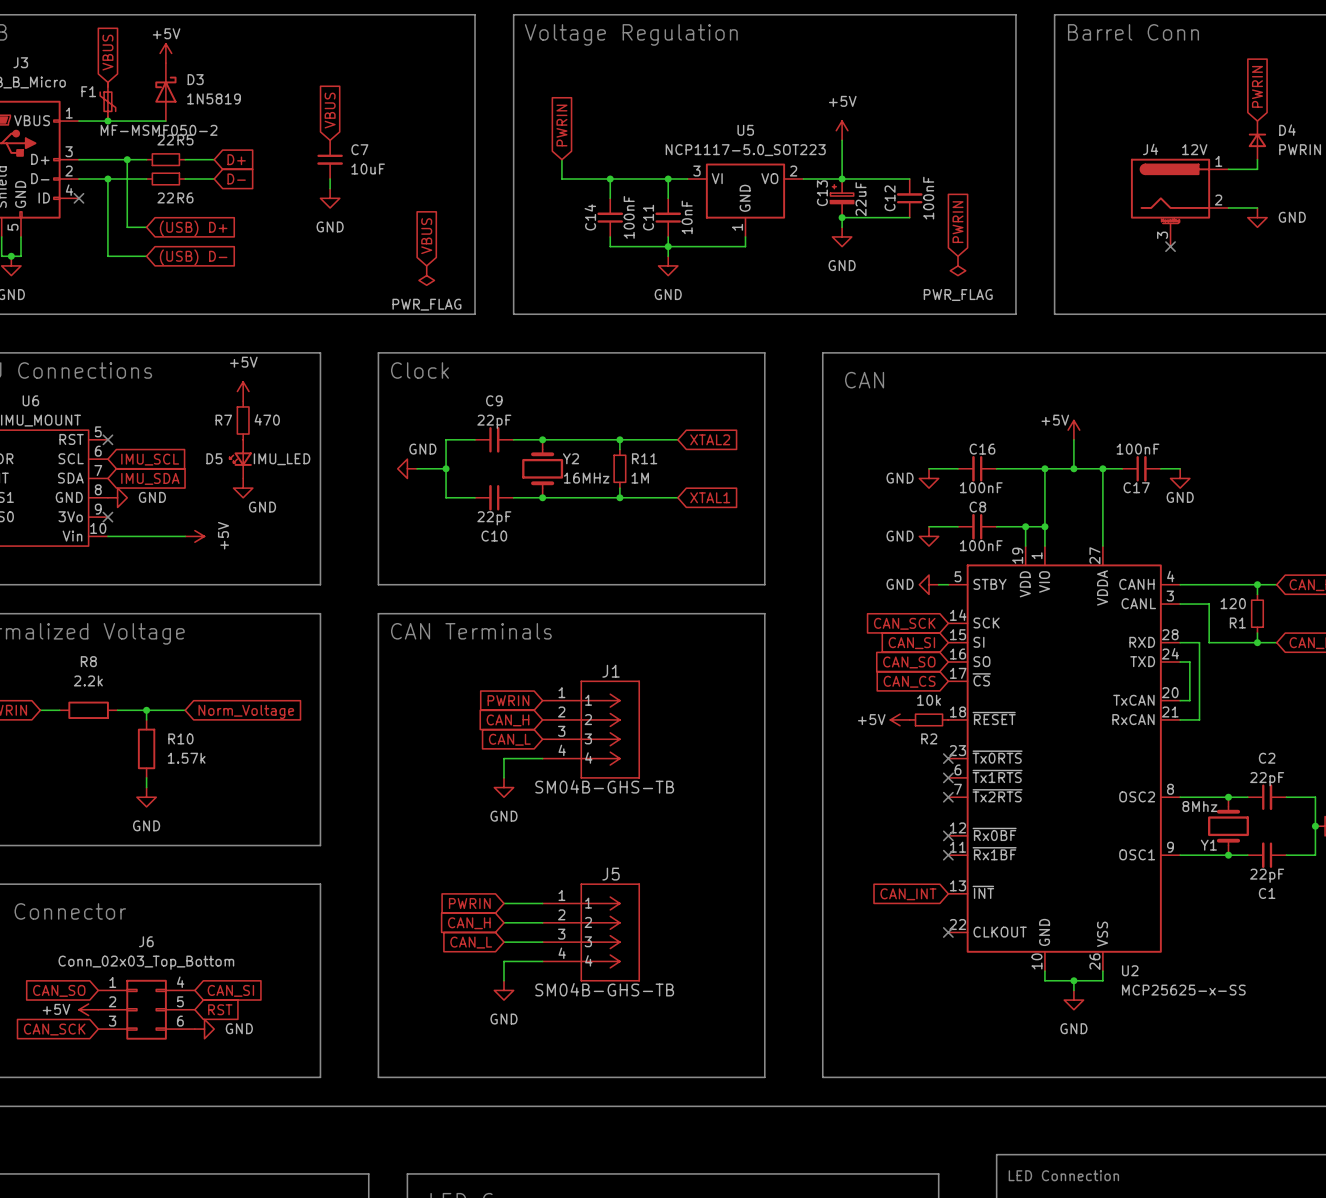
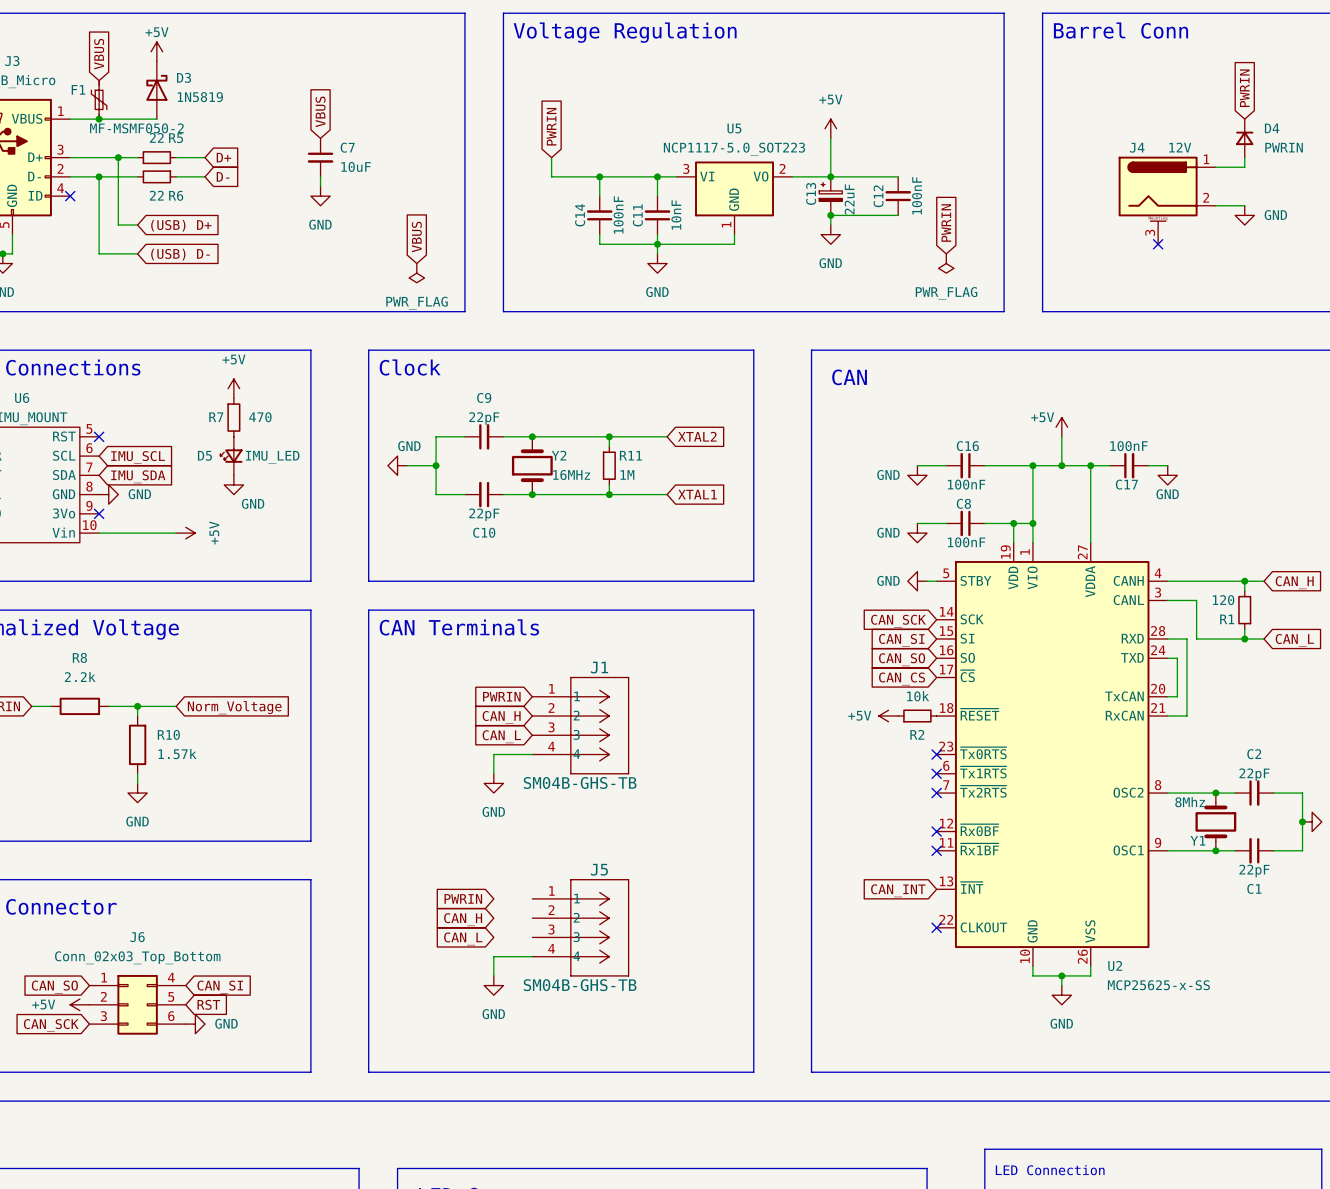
wire: (503, 903) (542, 903) -> none
wire: (503, 922) (542, 922) -> none
wire: (503, 942) (542, 942) -> none

